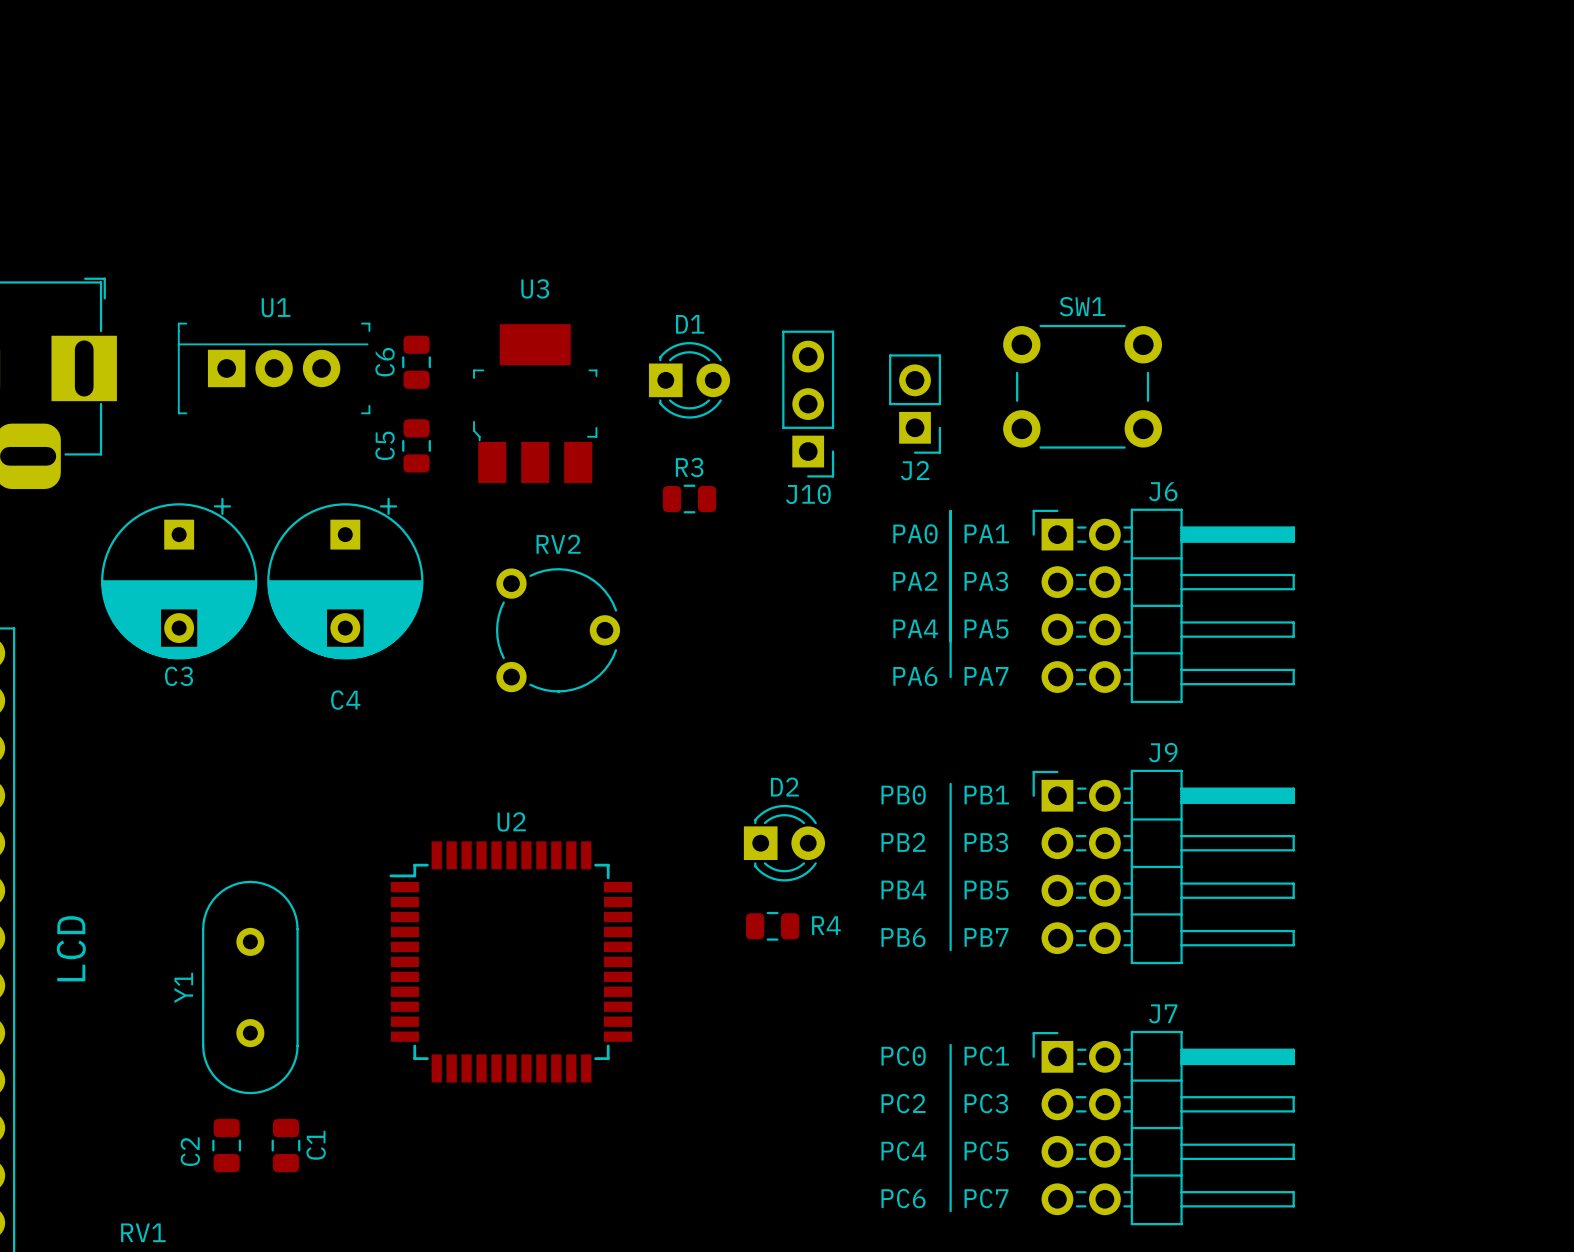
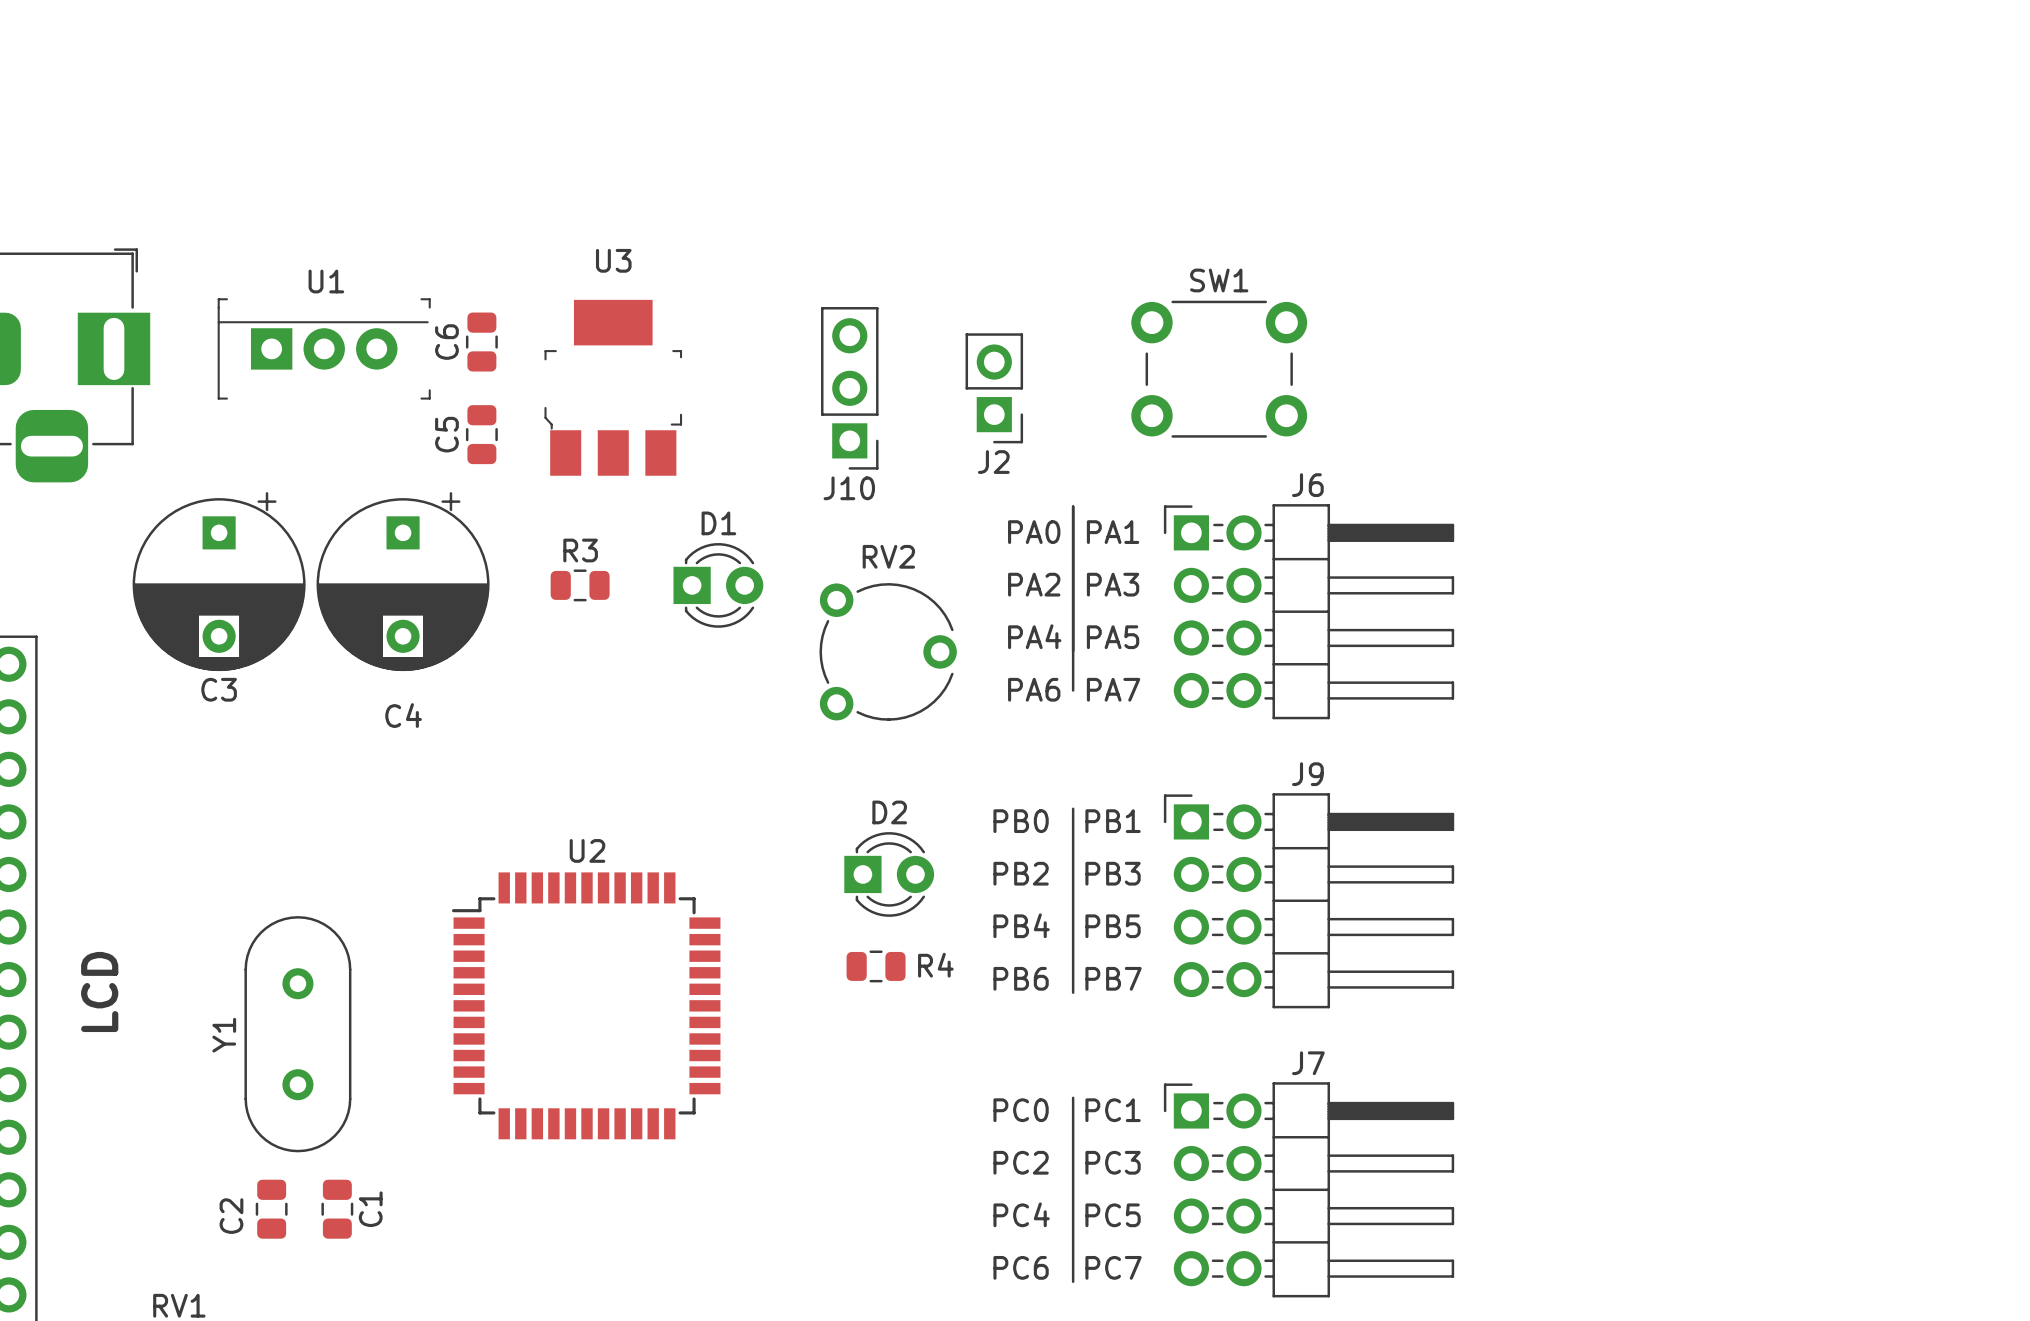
D1 footprint: [648, 342, 731, 419] -> [673, 543, 764, 628]
J10 position: (808, 404) -> (849, 388)
J2 position: (915, 404) -> (994, 388)
R3 position: (689, 499) -> (580, 585)
RV2 position: (558, 630) -> (888, 651)

